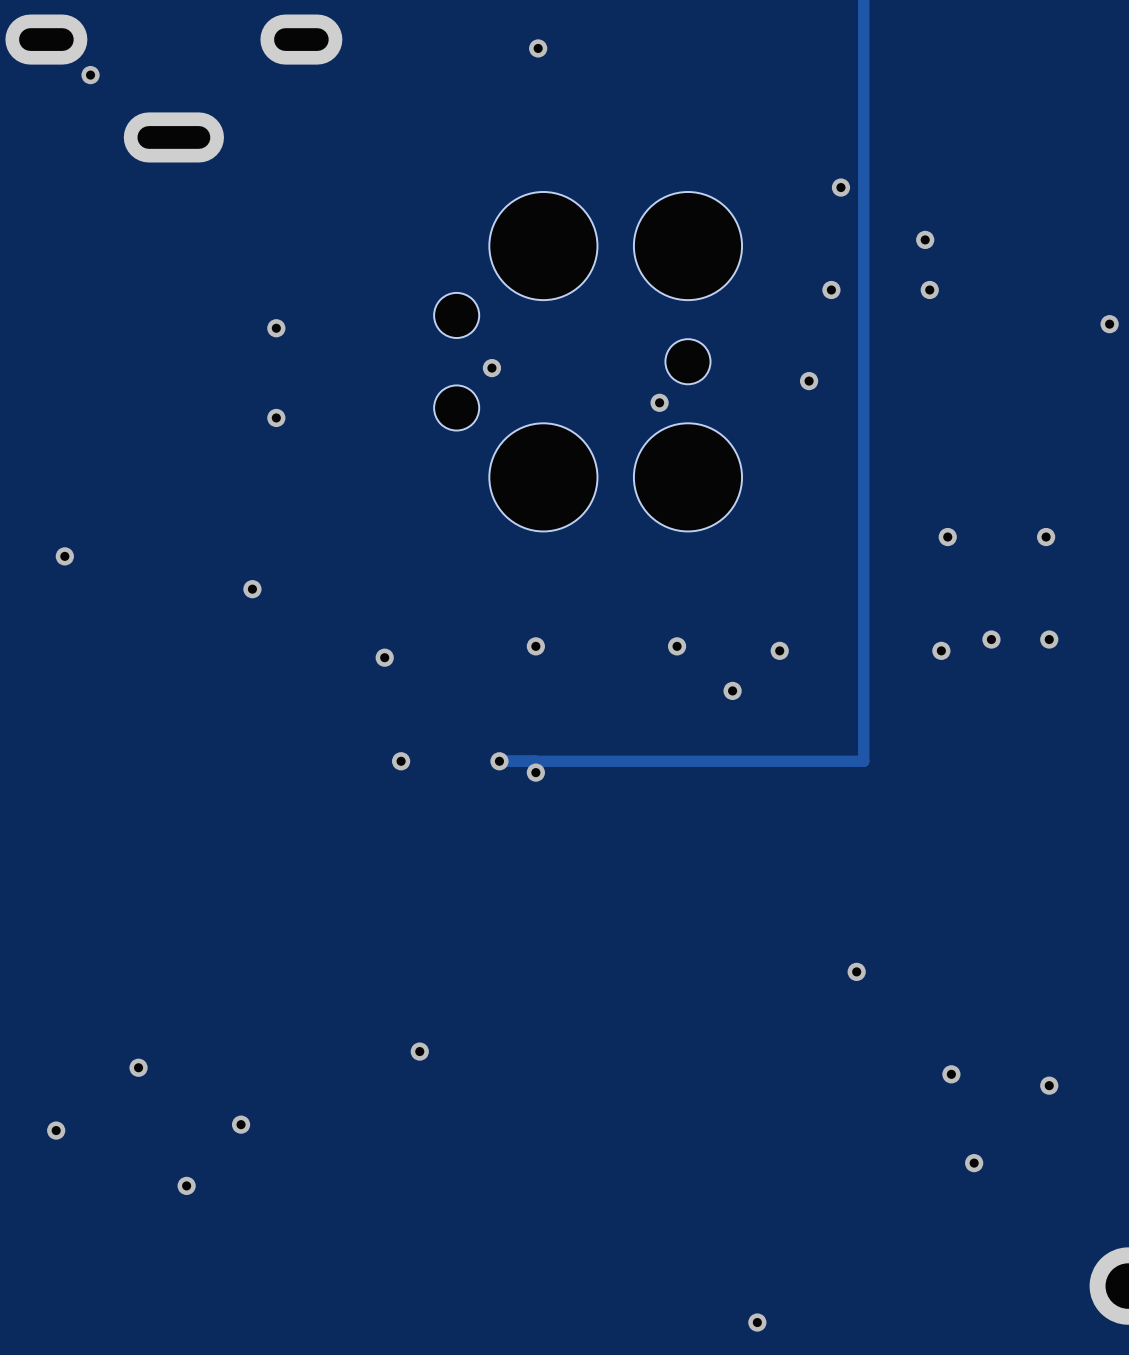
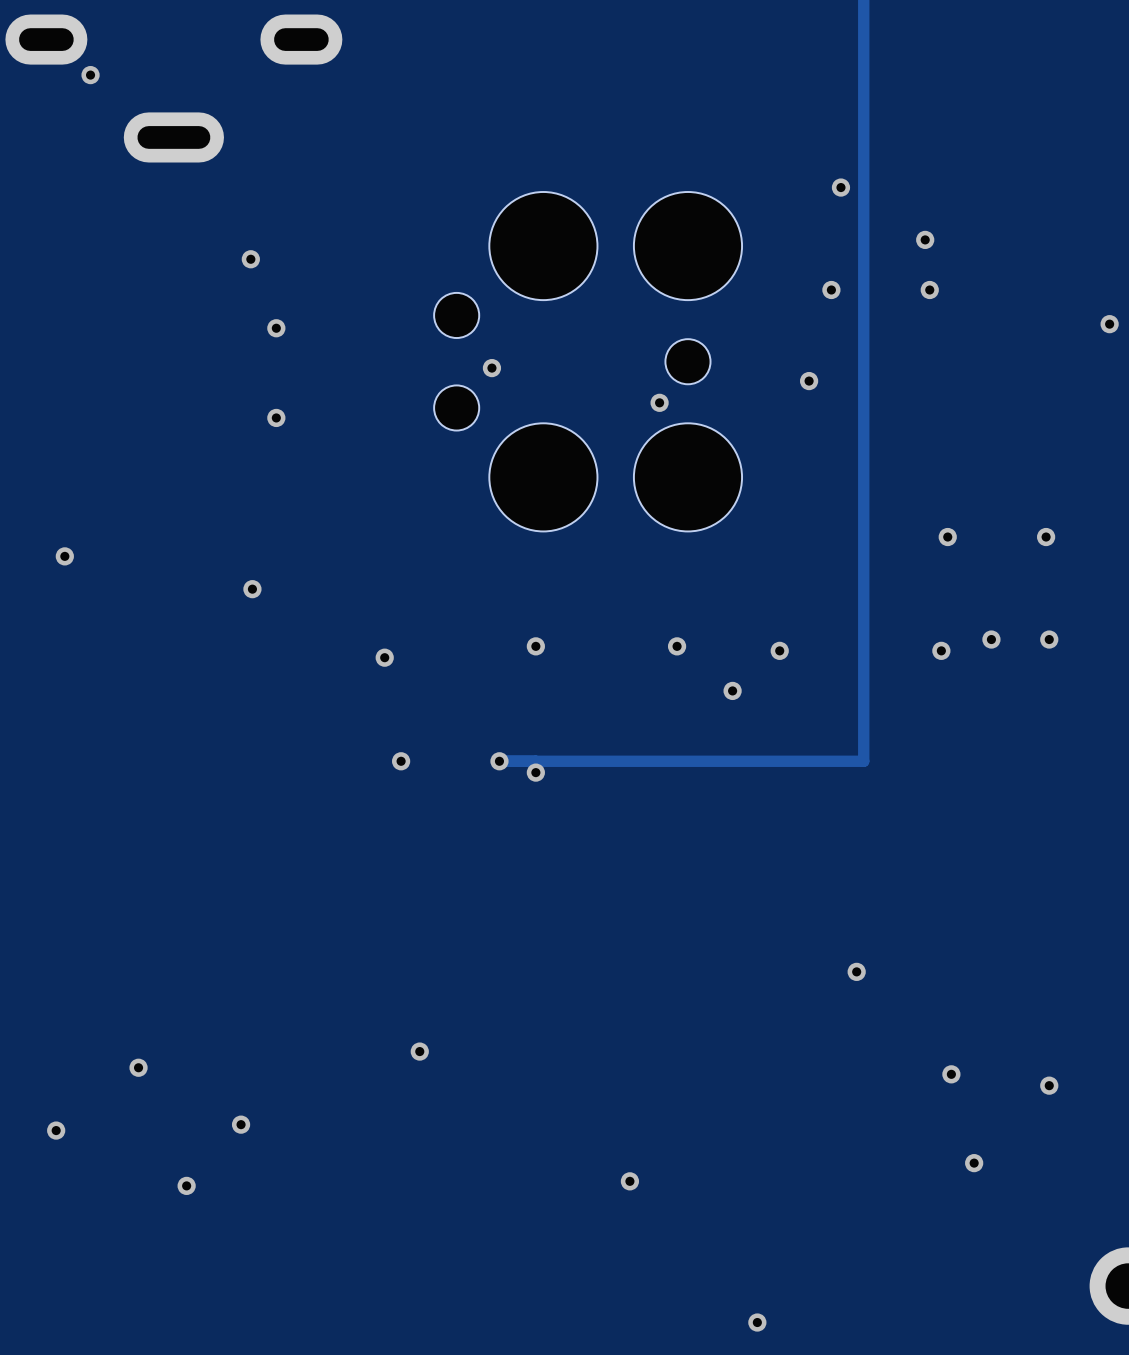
via: (538, 48) -> none
via: none -> (250, 259)
via: none -> (629, 1181)

